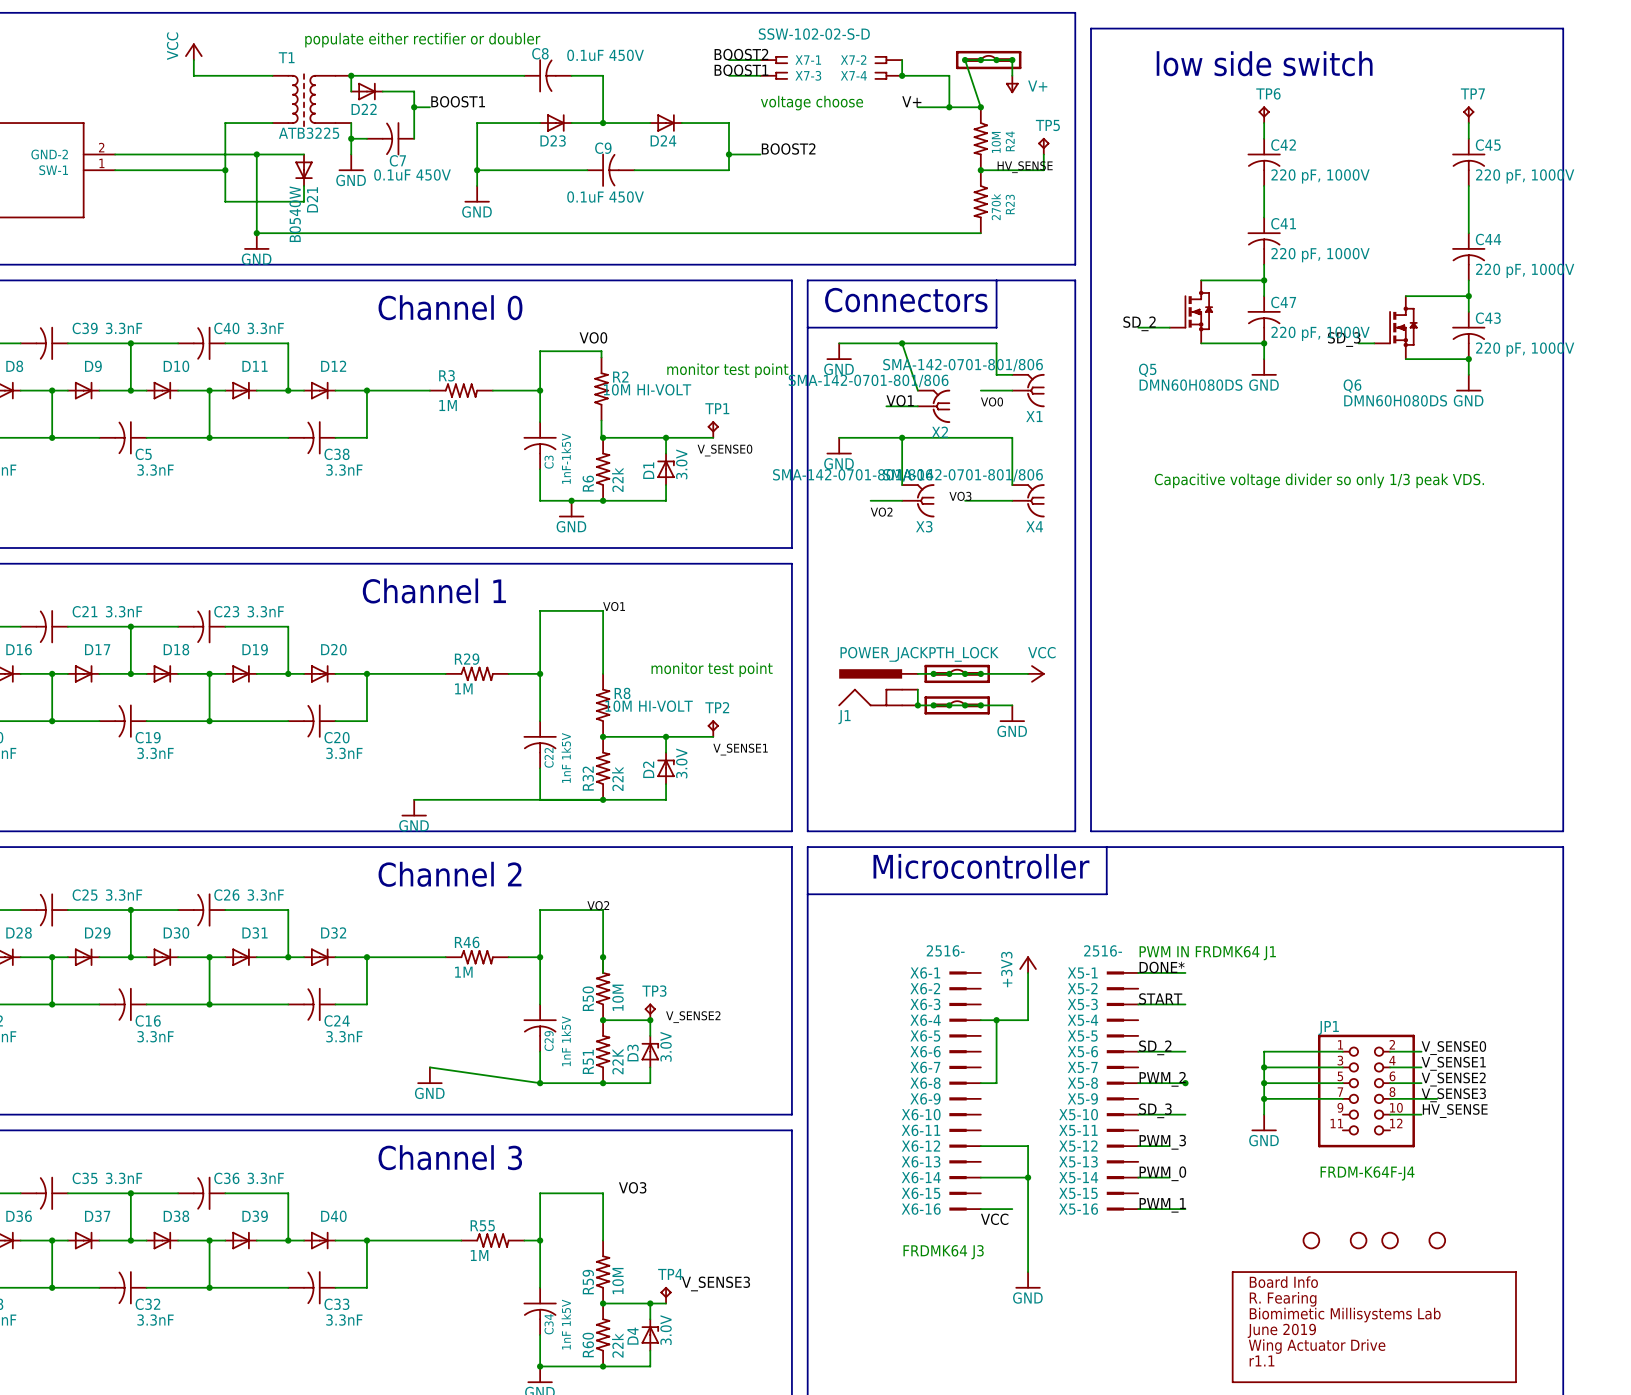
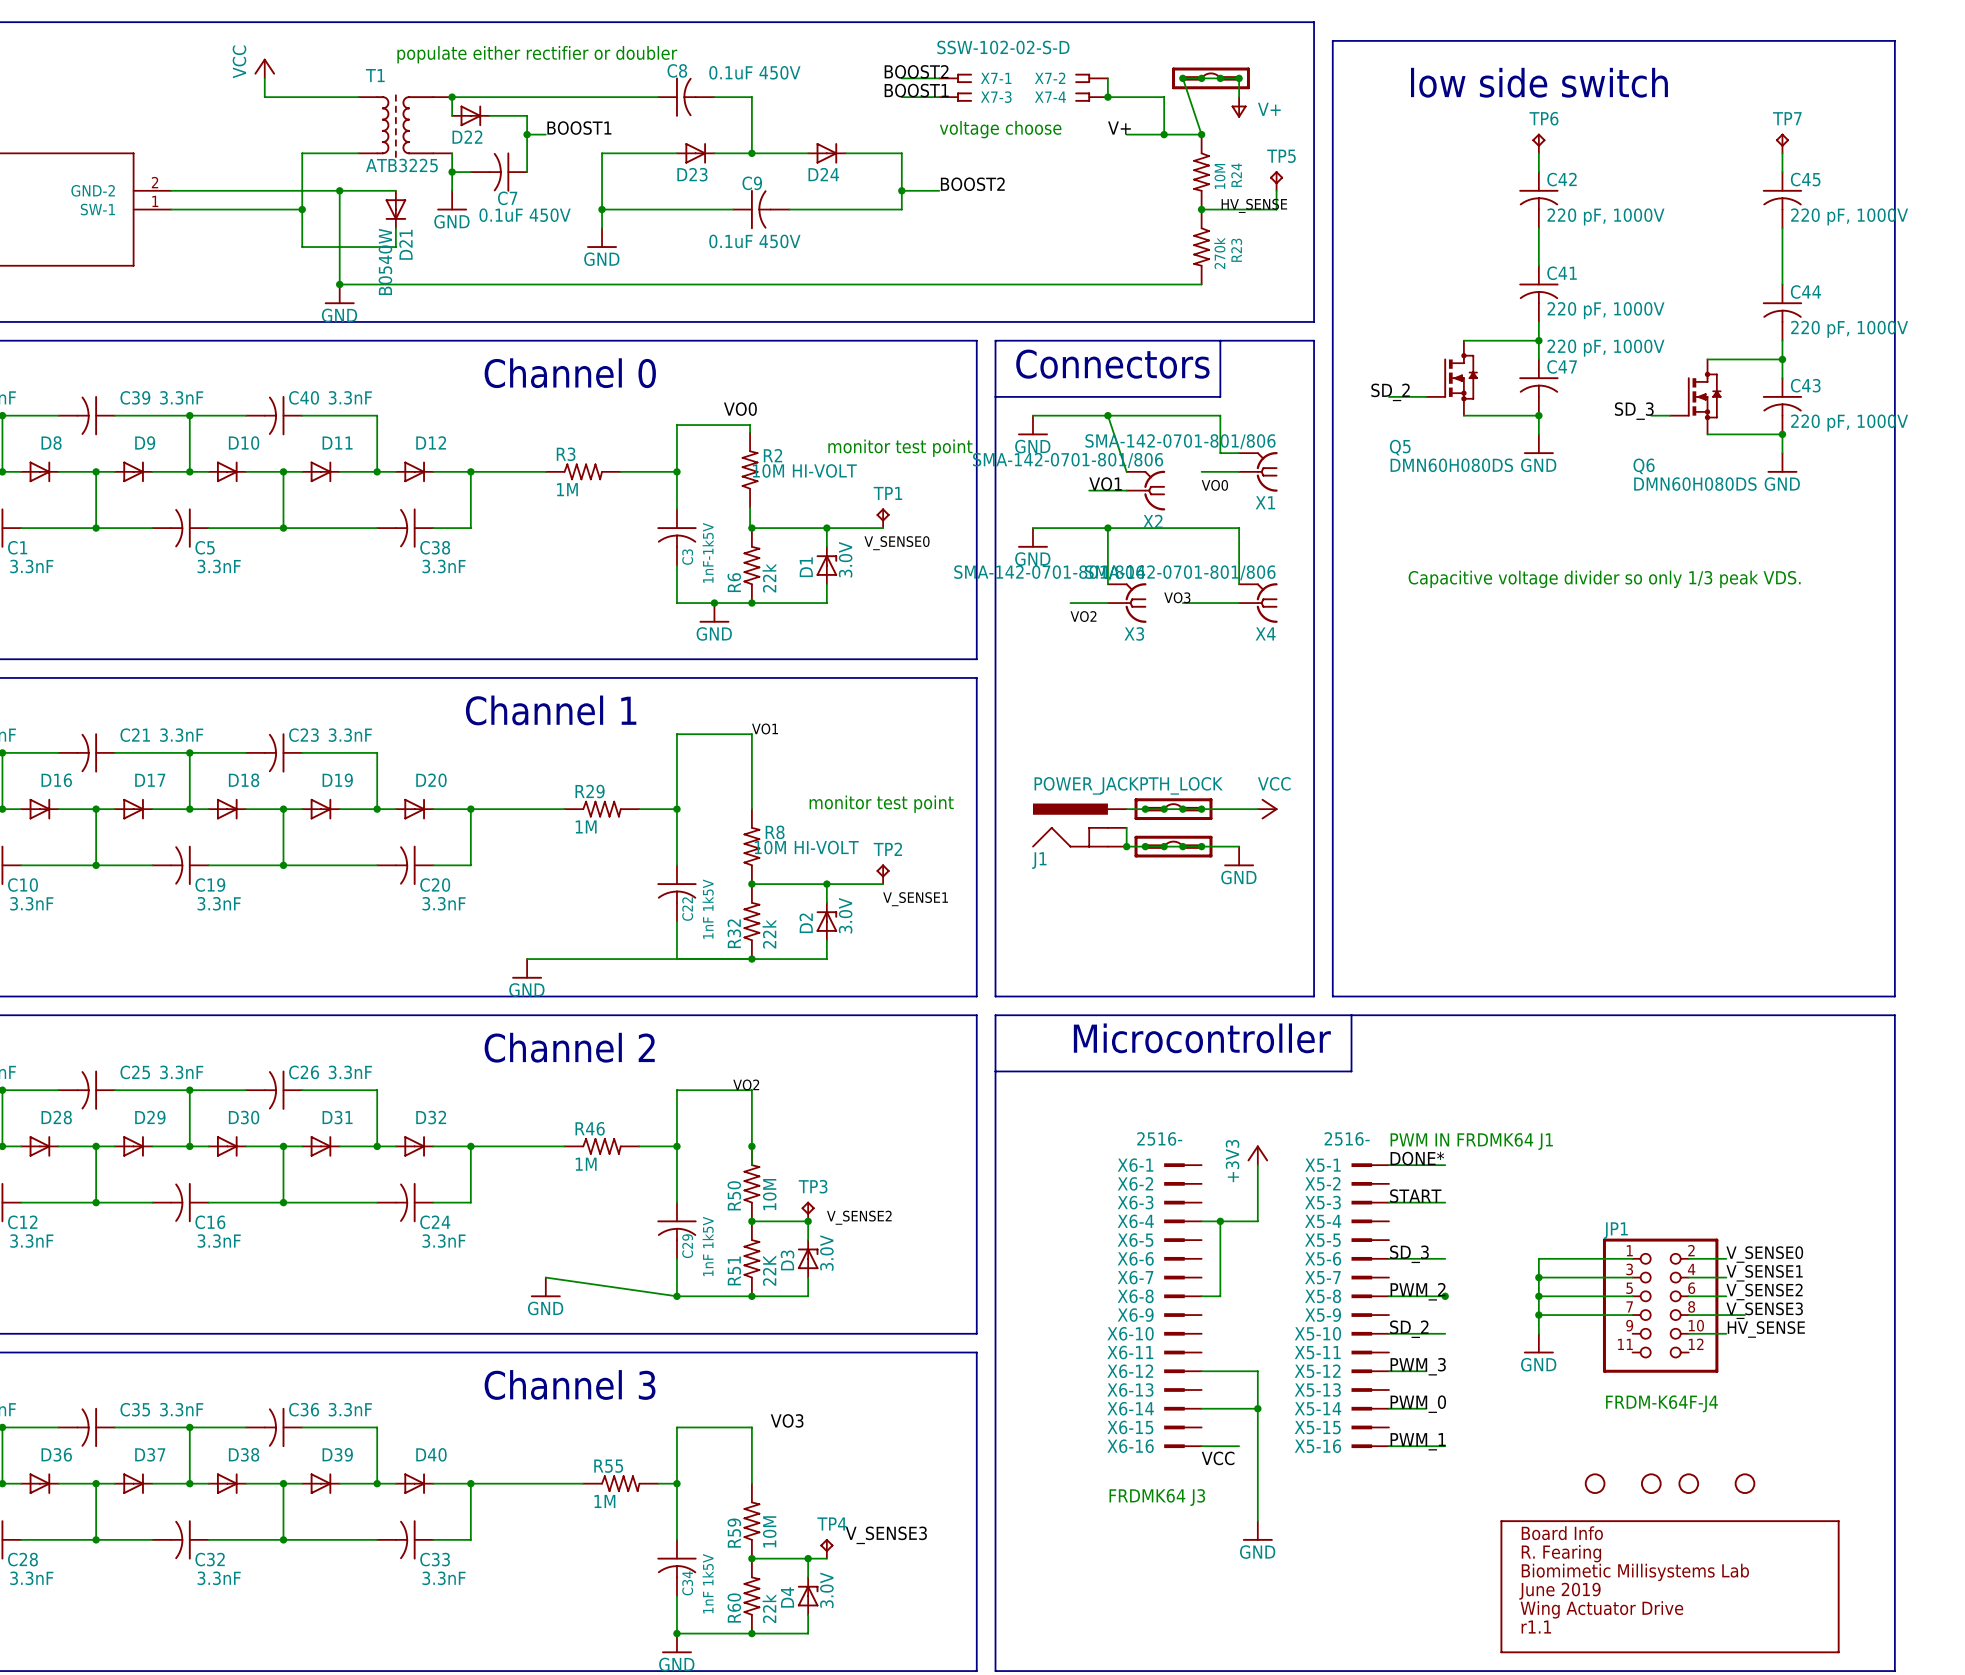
C47 value position: 220 pF, 1000V (1320, 333) -> 220 pF, 1000V (1606, 348)
label: SD_2 (1155, 1047) -> SD_3 (1409, 1254)
label: SD_3 (1155, 1110) -> SD_2 (1409, 1329)

